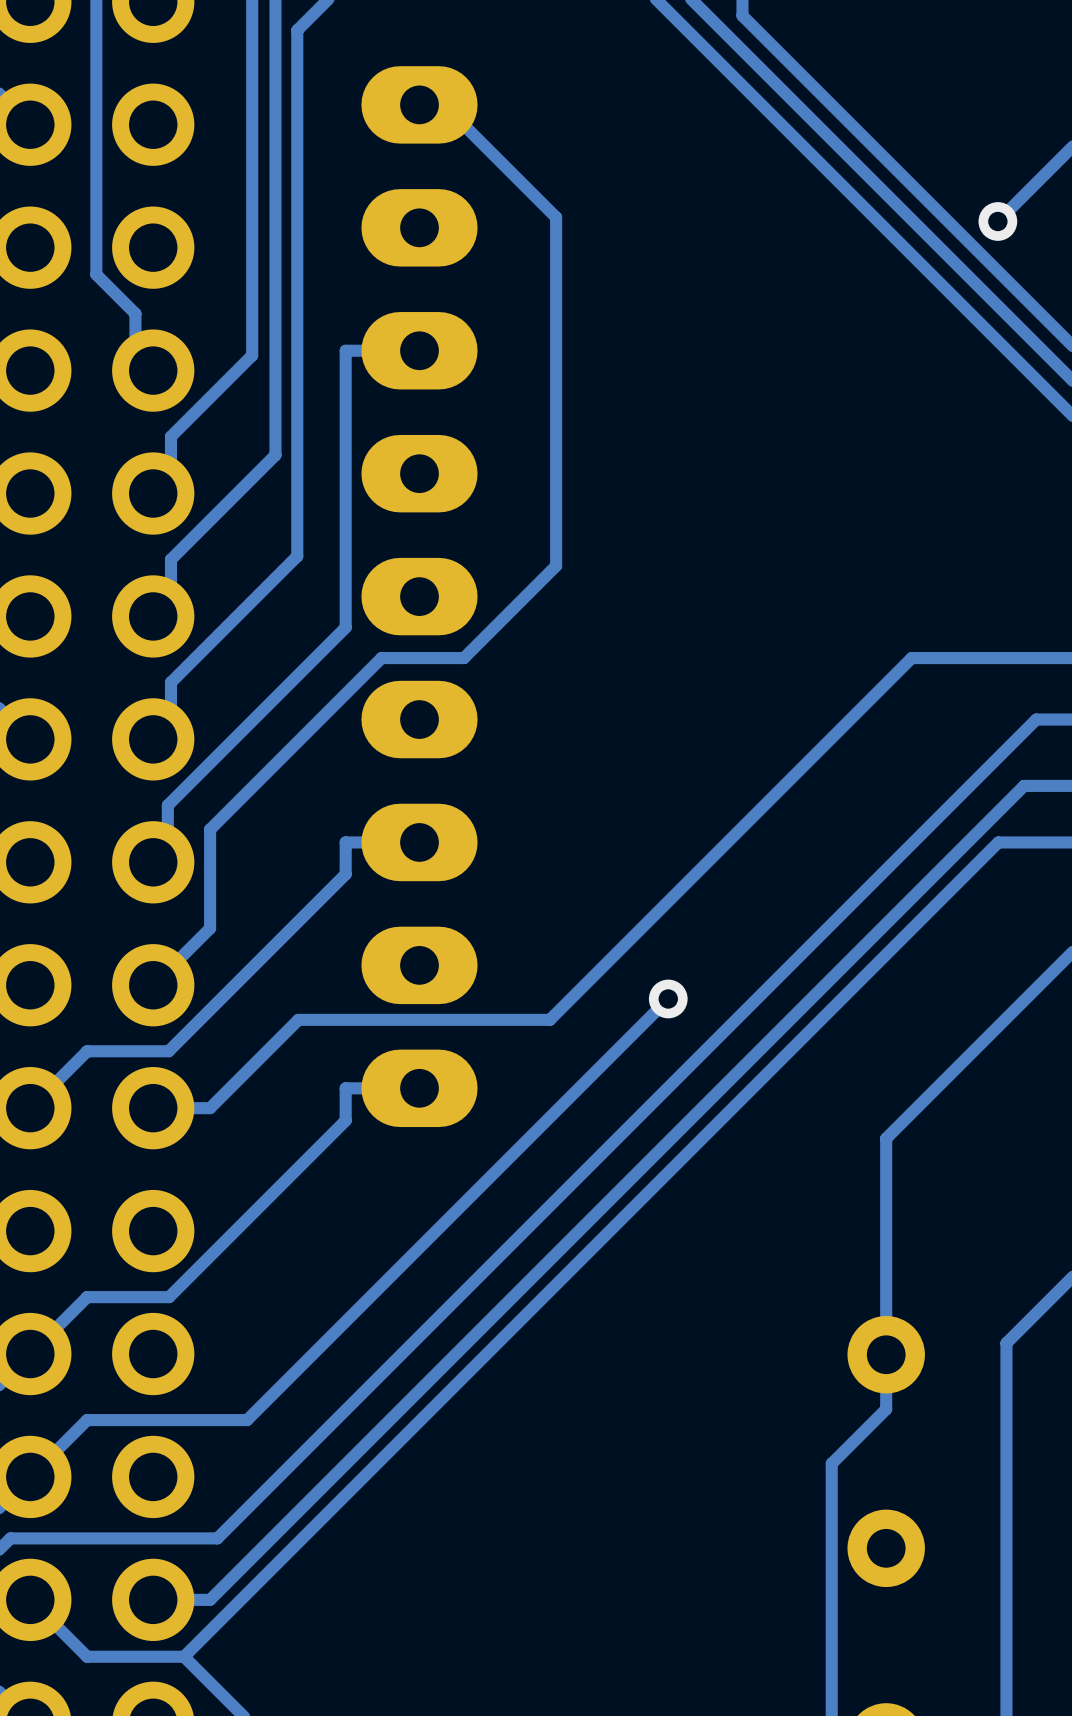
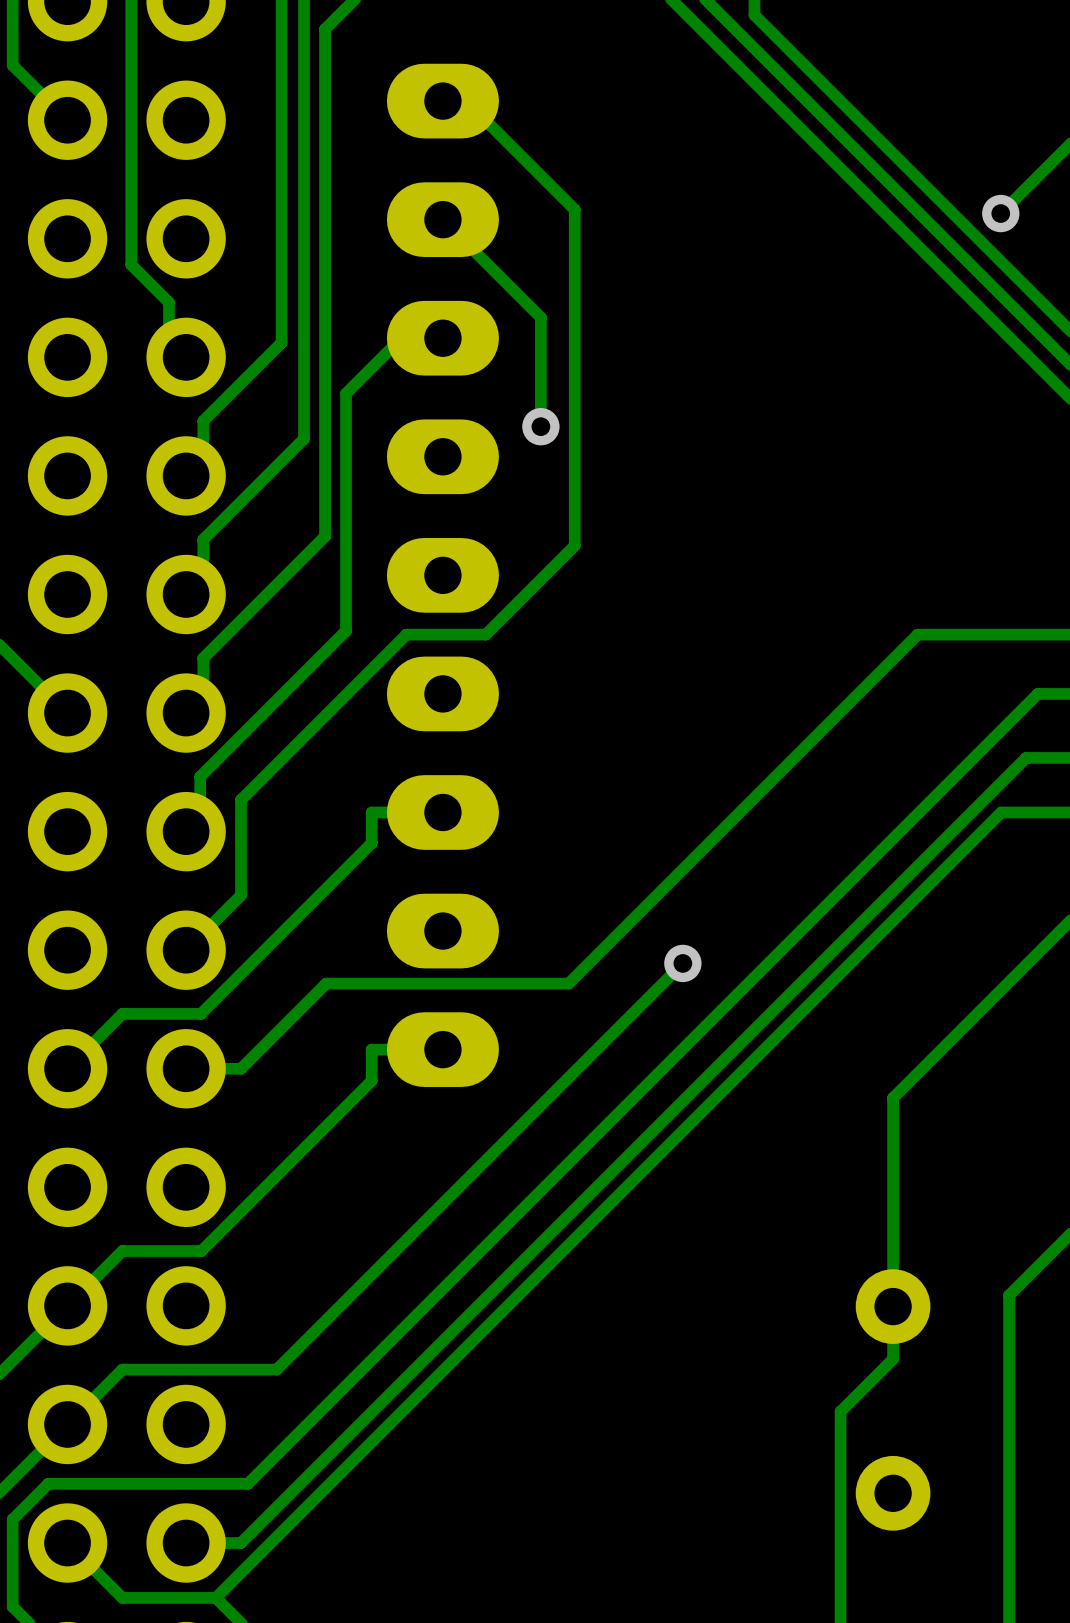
track: none -> (442, 219) (540, 317) (540, 426)
track: (419, 350) (345, 350) (345, 627) (319, 654) -> (401, 338) (346, 393) (346, 630)
via: none -> (540, 426)

